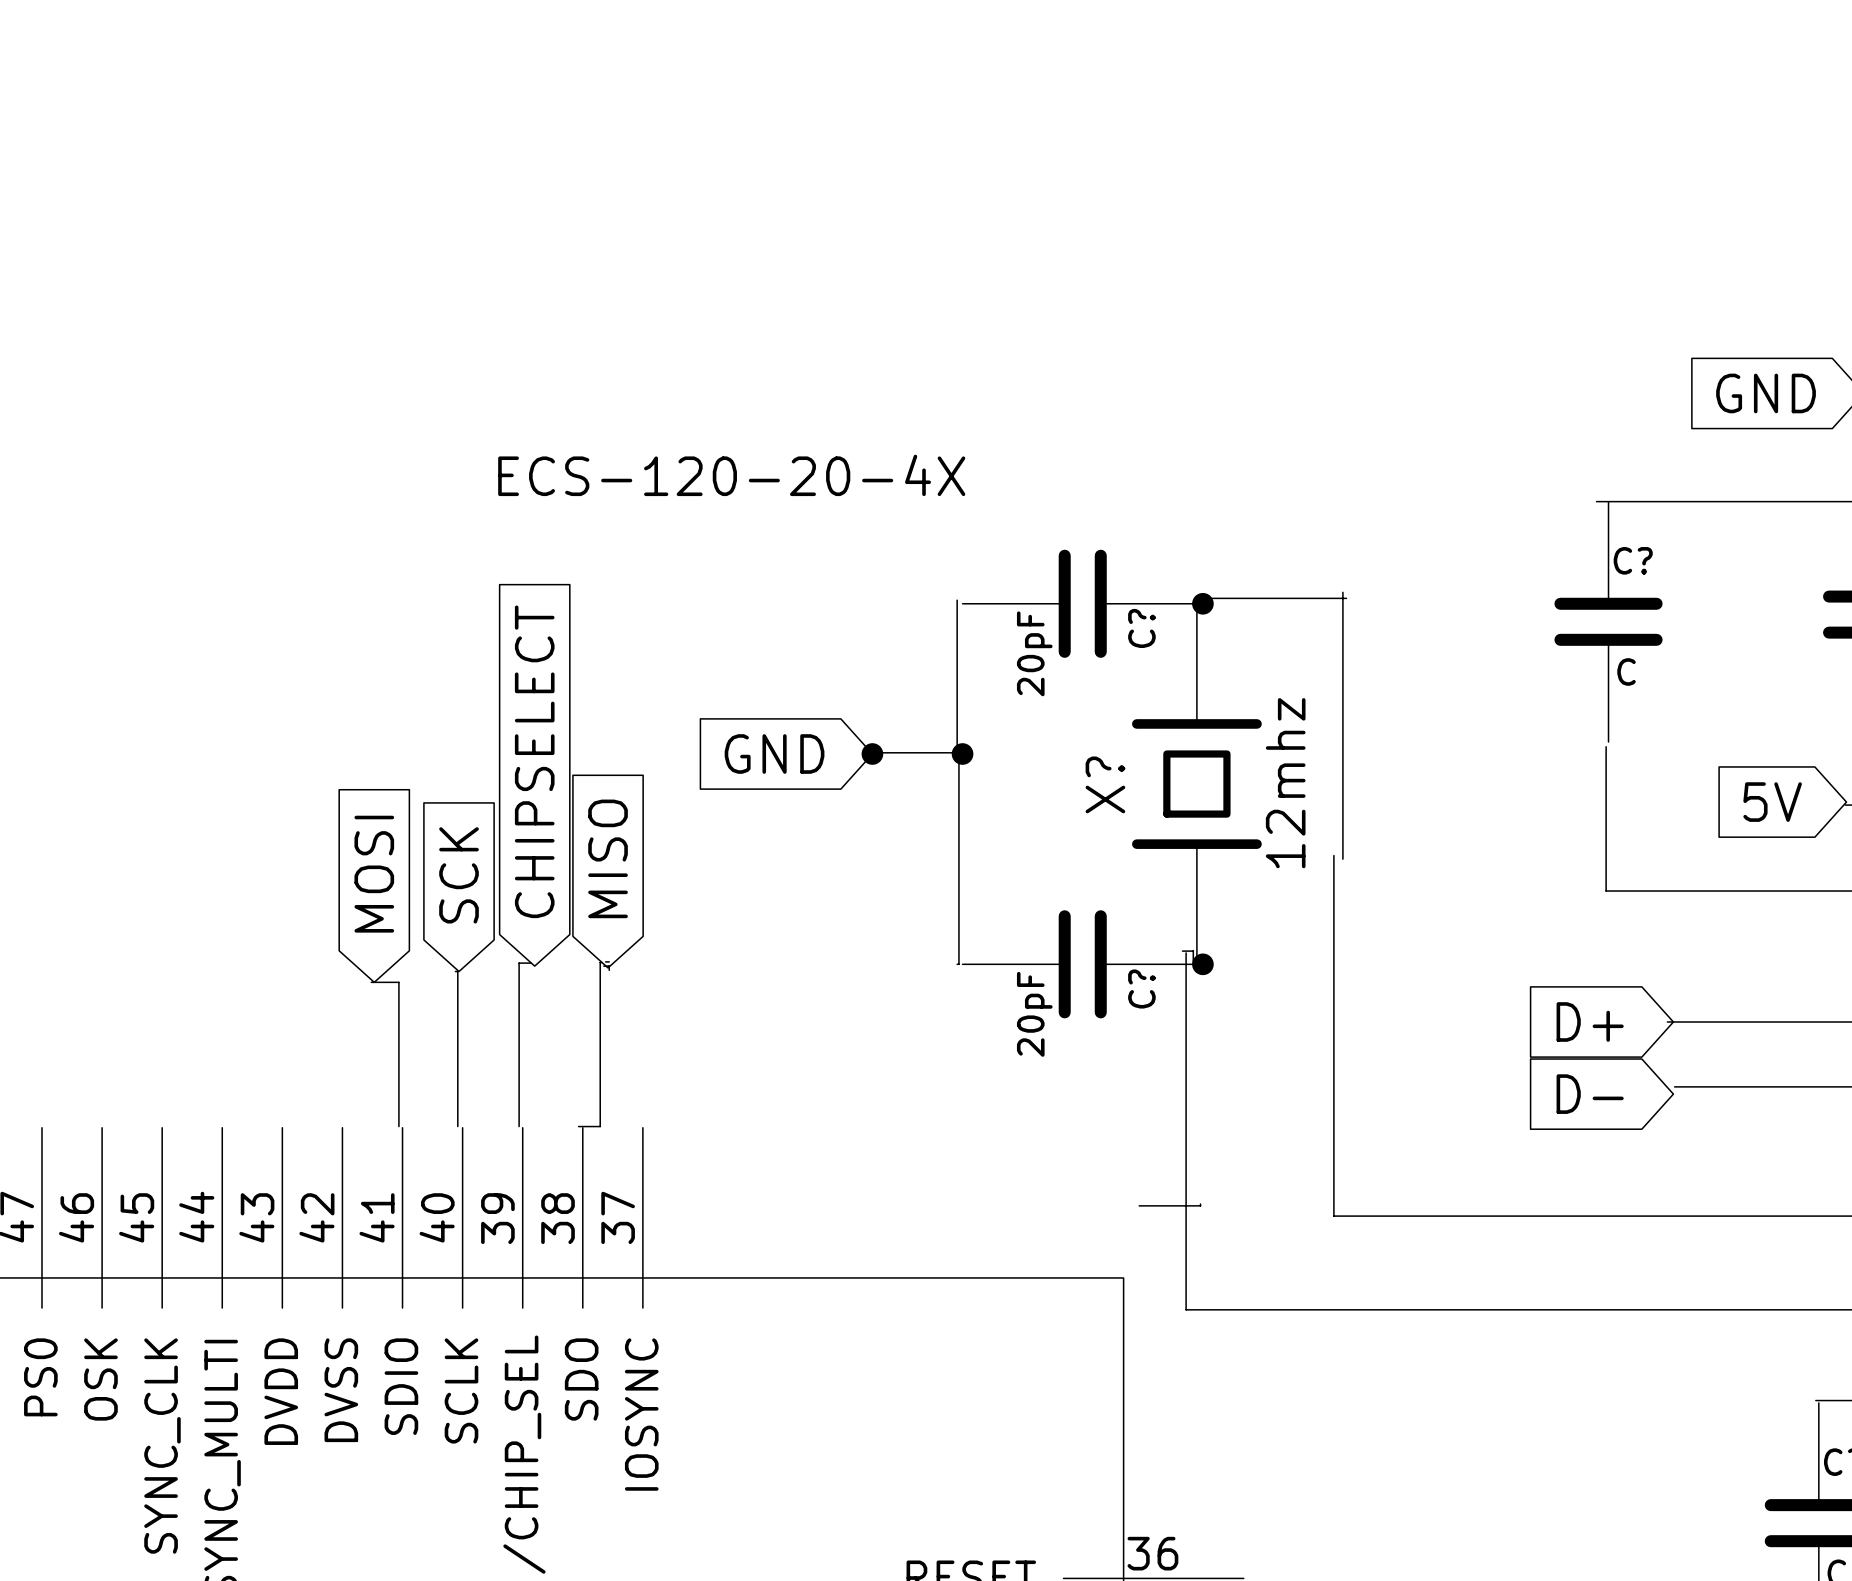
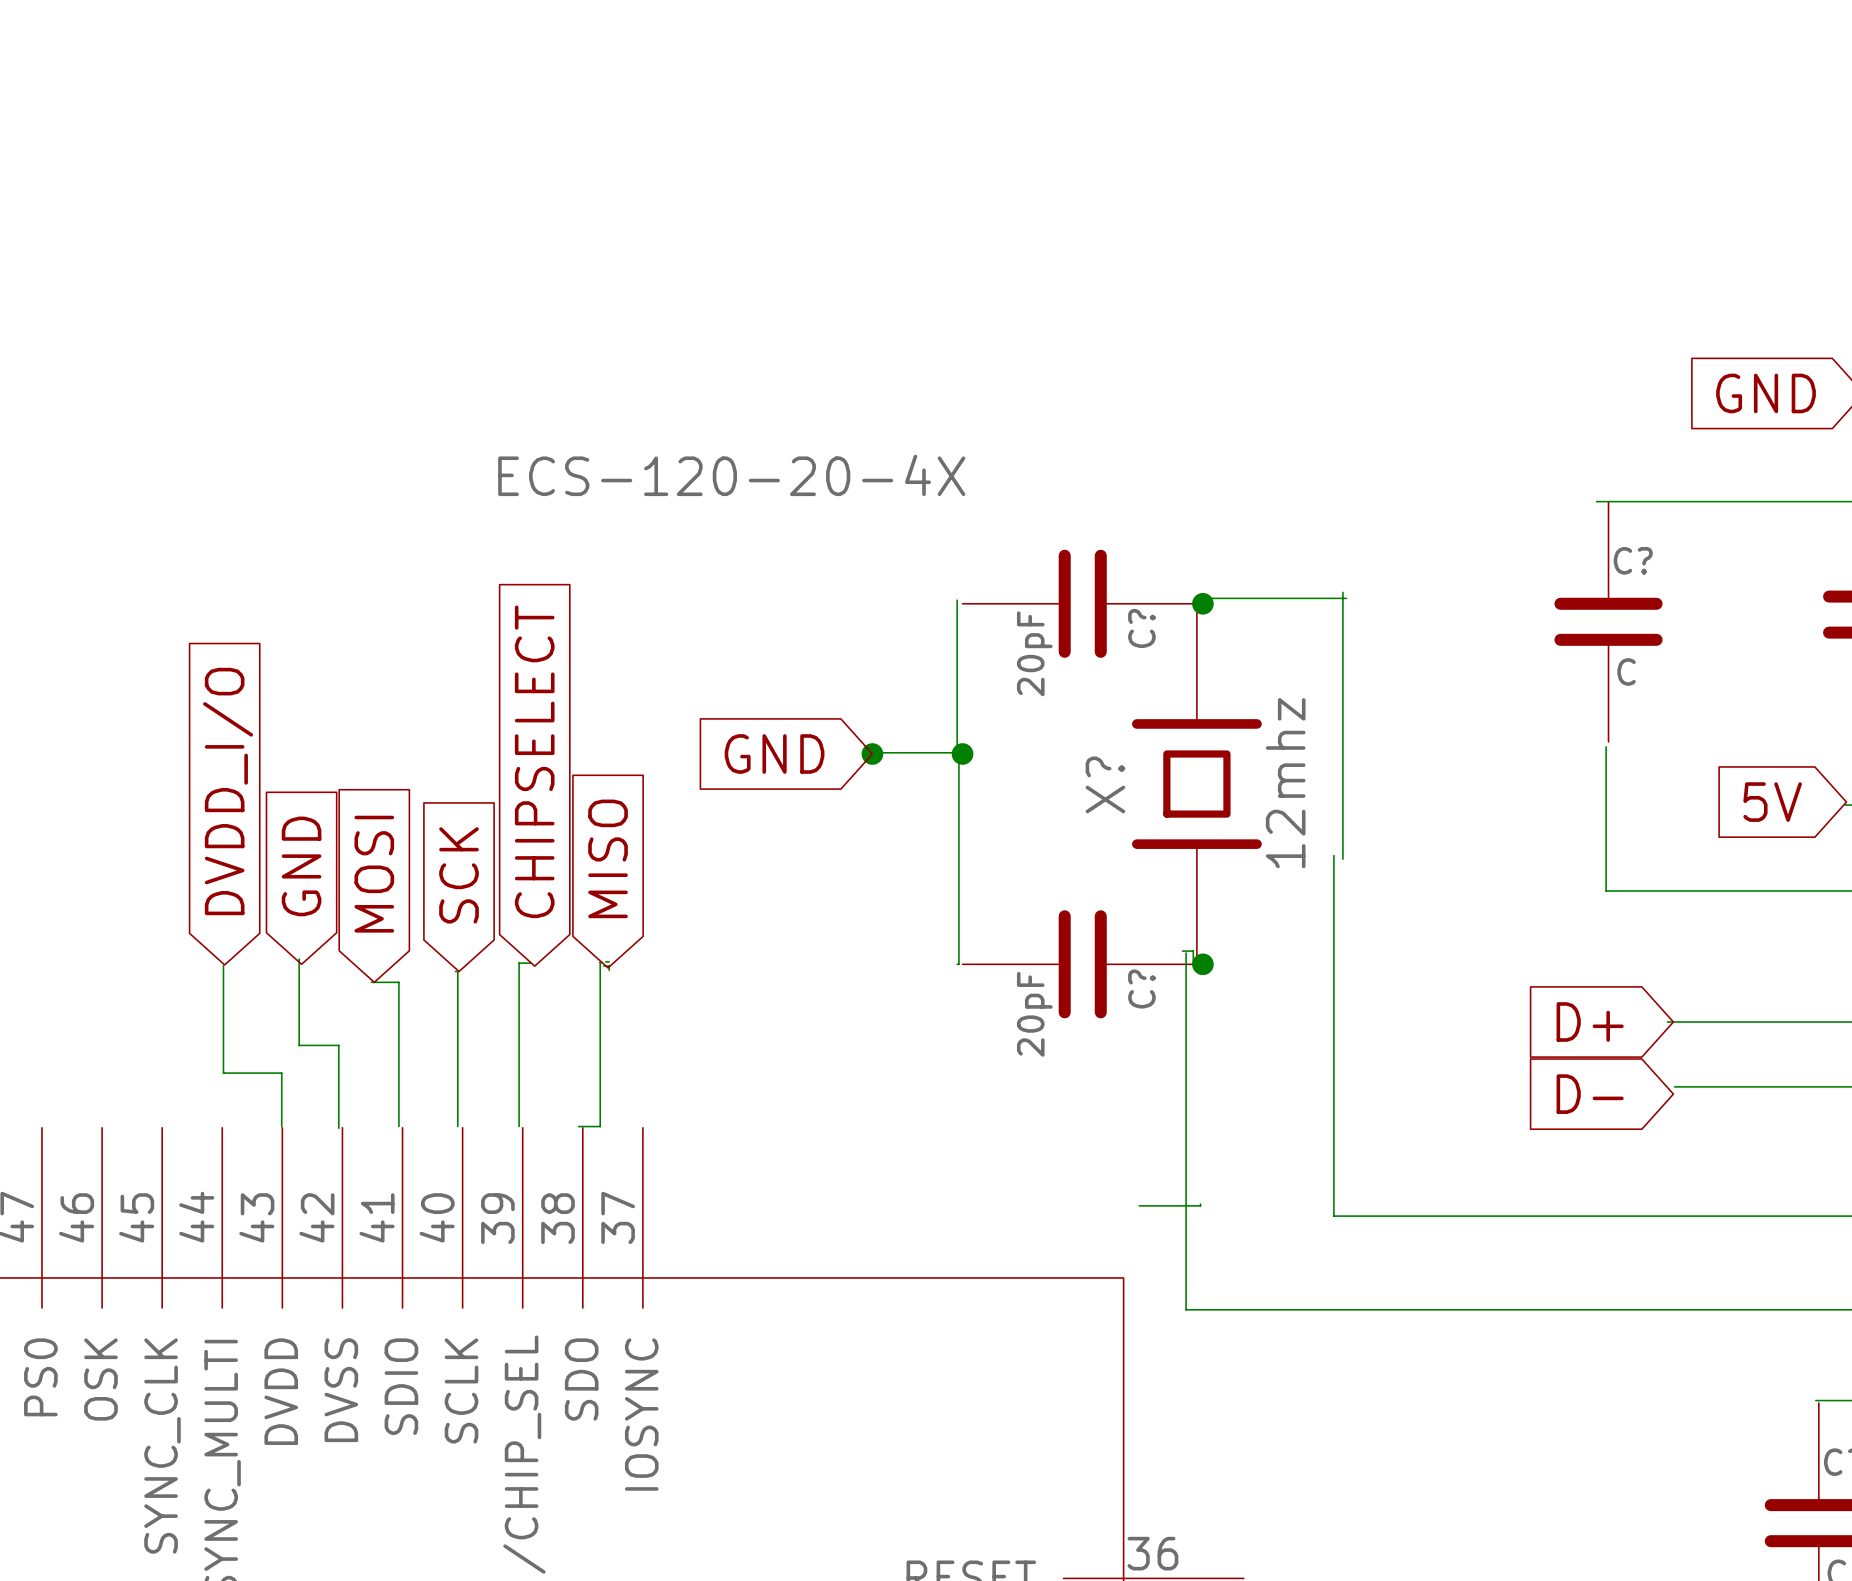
global label: none -> DVDD_I/O (228, 791)
global label: none -> GND (301, 866)
wire: none -> (299, 958) (299, 1045) (338, 1045) (338, 1128)
wire: none -> (223, 965) (223, 1073) (281, 1073) (281, 1126)

